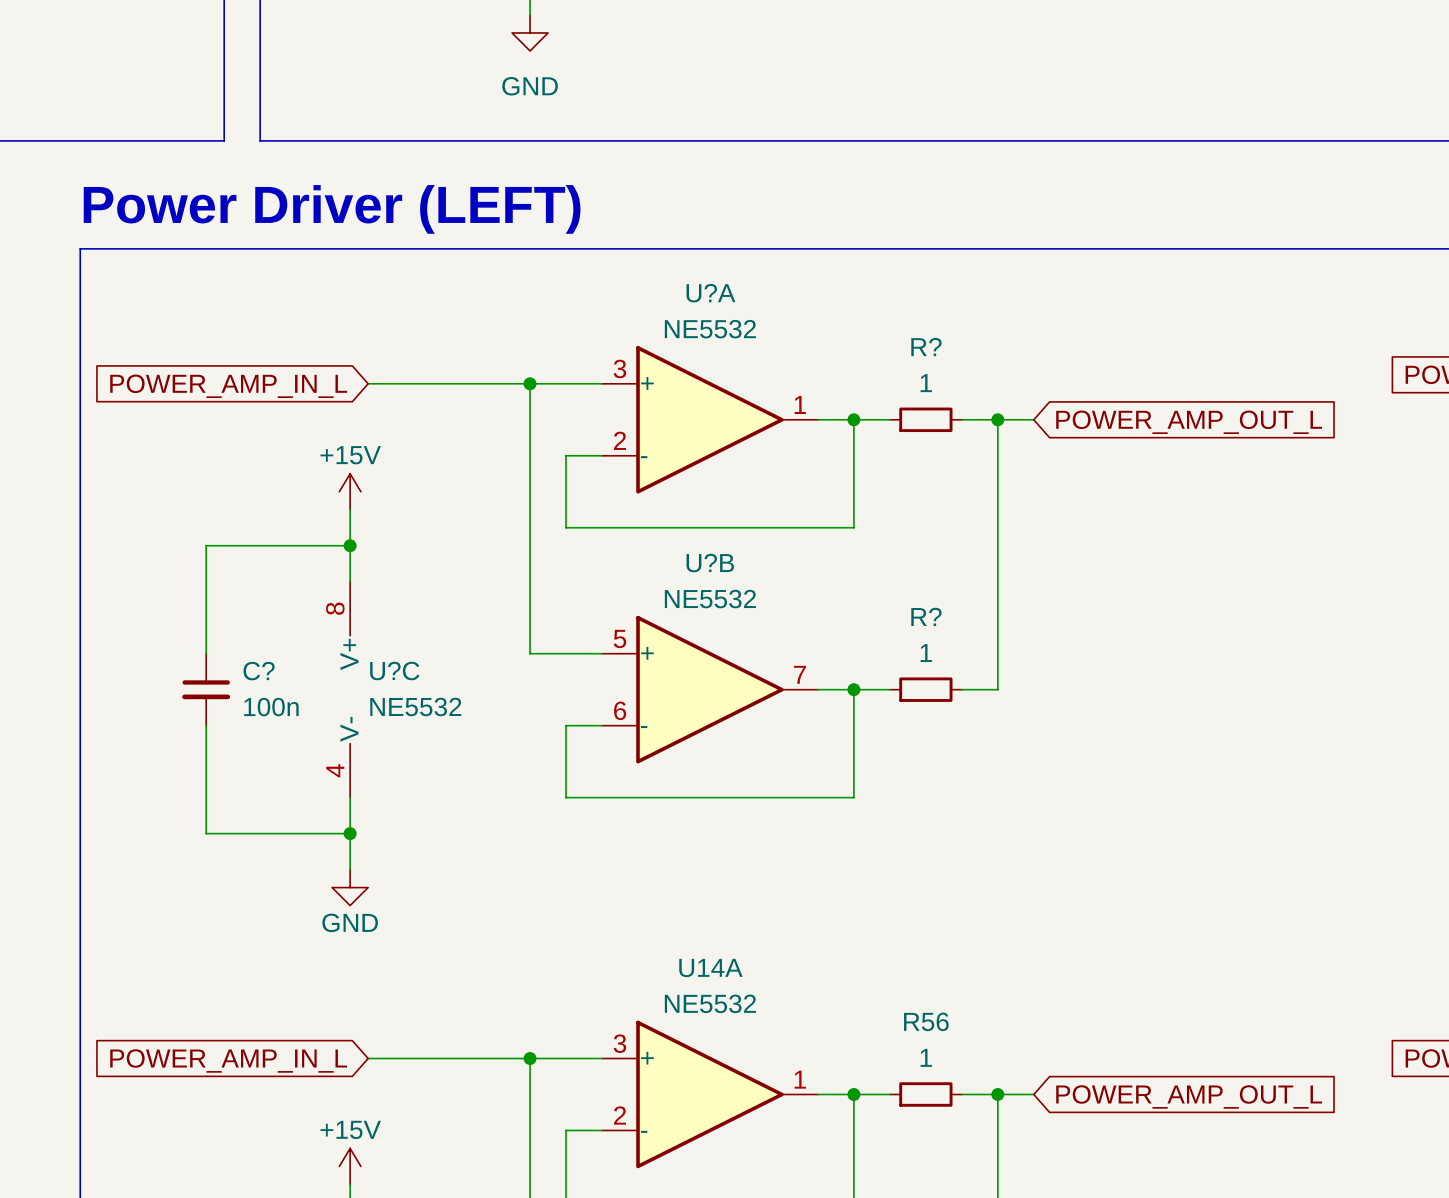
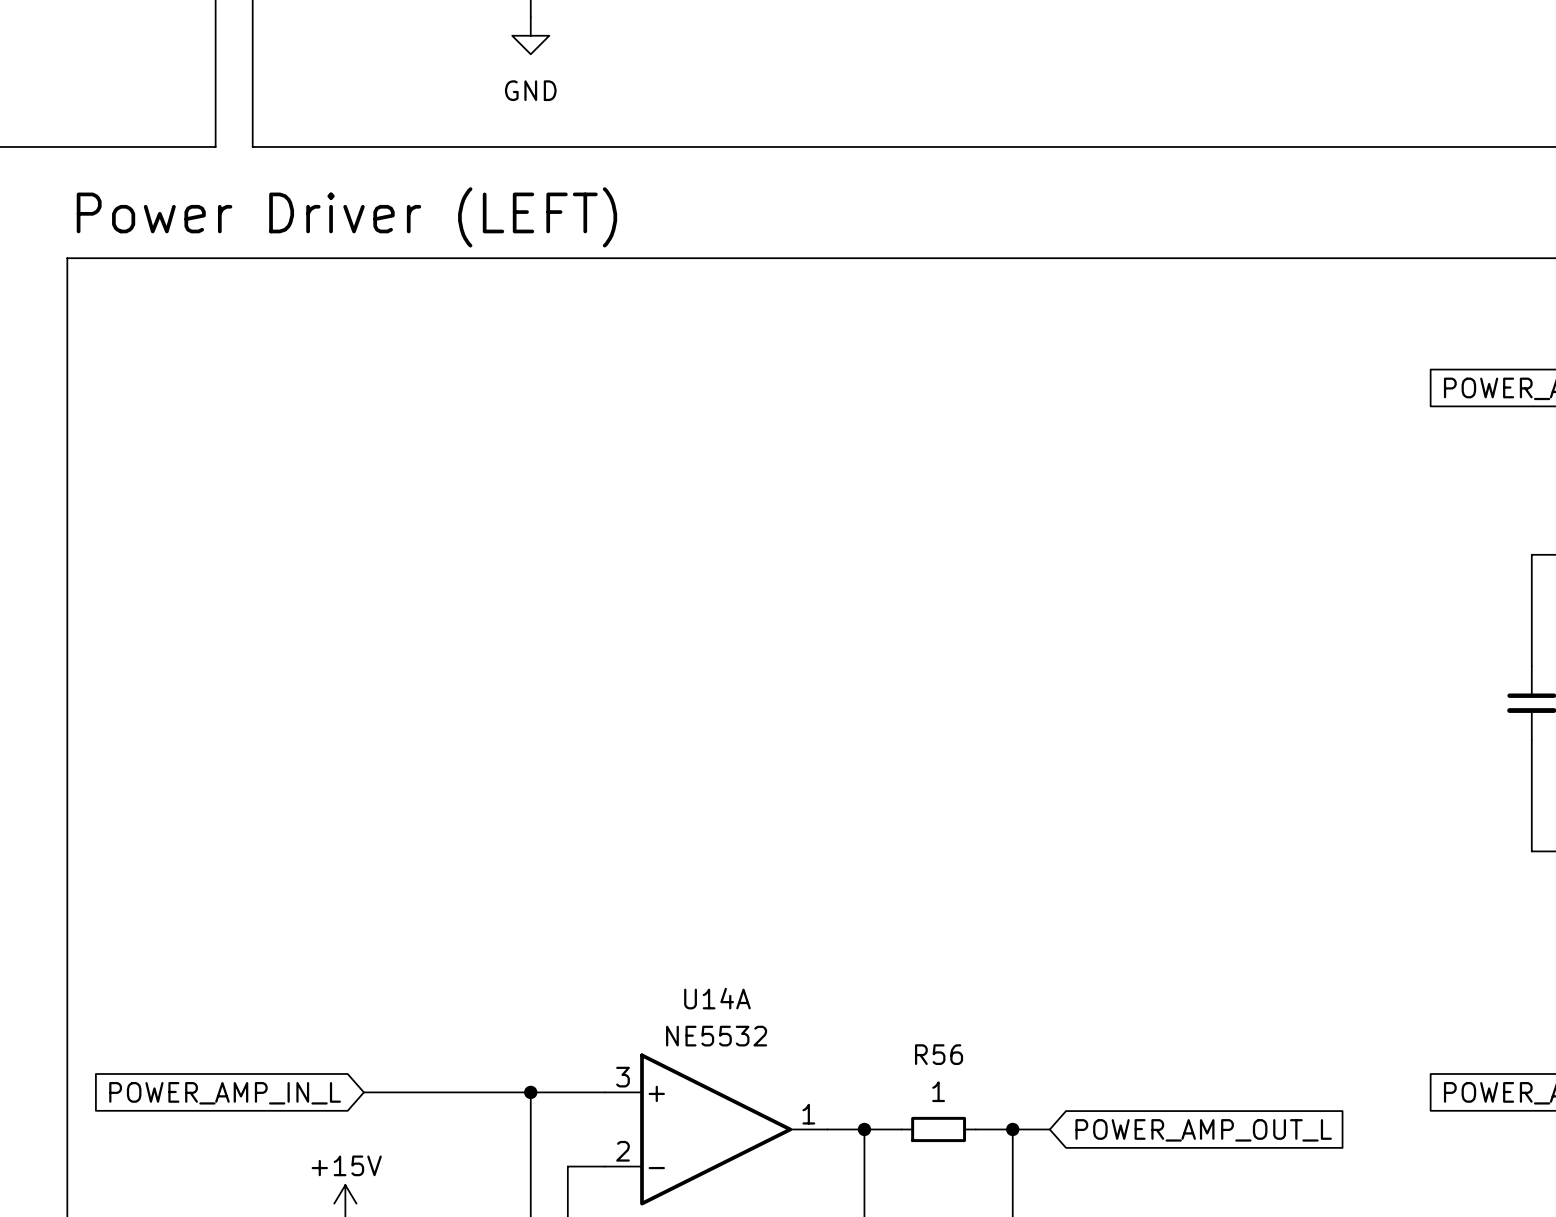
wire: (368, 383) (602, 383) -> none
wire: (530, 383) (530, 653) (602, 653) -> none
junction: (530, 383) -> none
global label: POWER_AMP_IN_L (228, 386) -> none
U?A: NE5532 (709, 419) -> none
wire: (817, 419) (889, 419) -> none
wire: (853, 419) (853, 527) (566, 527) (566, 455) (602, 455) -> none
junction: (853, 419) -> none
R?: 1 (925, 419) -> none
wire: (961, 419) (1033, 419) -> none
wire: (997, 419) (997, 689) (961, 689) -> none
junction: (997, 419) -> none
global label: POWER_AMP_OUT_L (1189, 422) -> none
power symbol: +15V (350, 491) -> none
wire: (350, 509) (350, 581) -> none
wire: (350, 545) (206, 545) (206, 653) -> none
junction: (350, 545) -> none
C?: 100n (206, 689) -> none
U?C: NE5532 (350, 689) -> none
U?B: NE5532 (709, 689) -> none
wire: (817, 689) (889, 689) -> none
wire: (853, 689) (853, 797) (566, 797) (566, 725) (602, 725) -> none
junction: (853, 689) -> none
R?: 1 (925, 689) -> none
wire: (206, 725) (206, 833) (350, 833) -> none
wire: (350, 797) (350, 869) -> none
junction: (350, 833) -> none
power symbol: GND (350, 887) -> none

